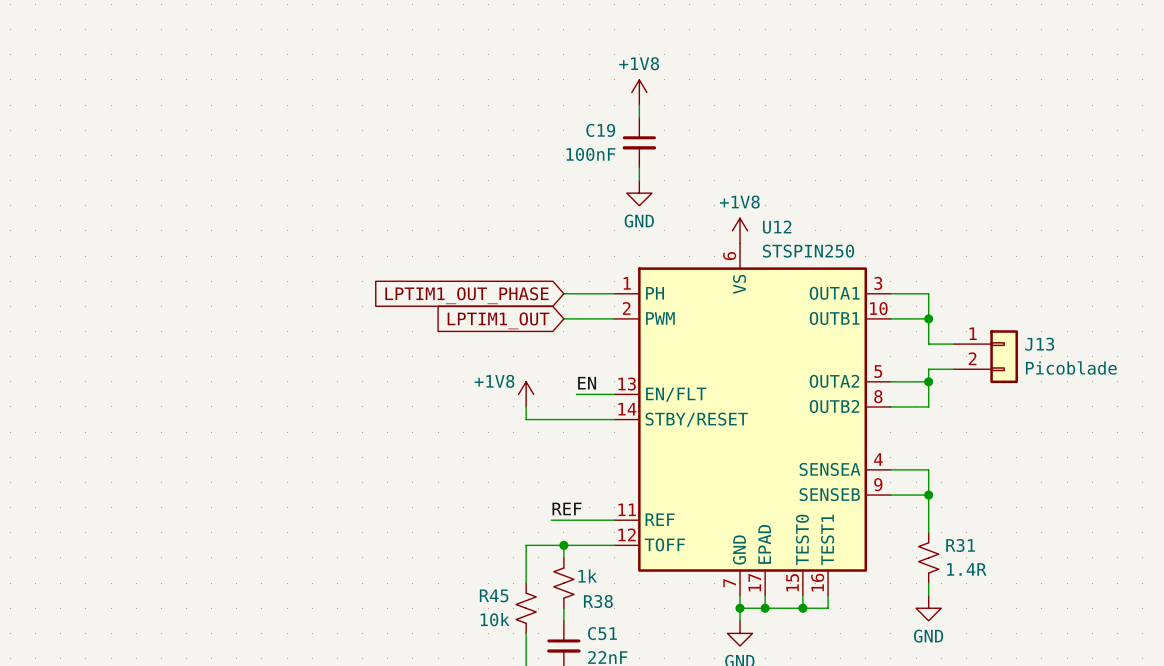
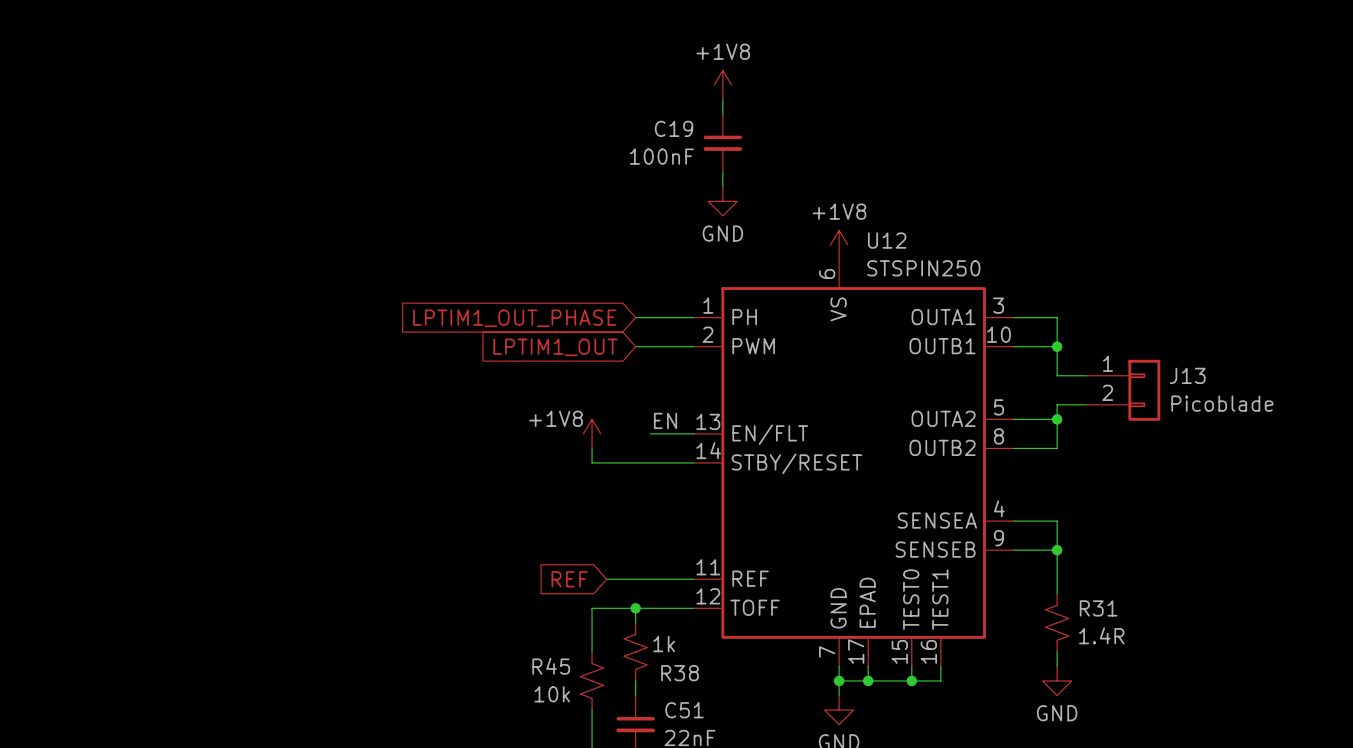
label: REF (566, 508) -> none
global label: none -> REF (569, 579)
wire: none -> (606, 579) (621, 579)

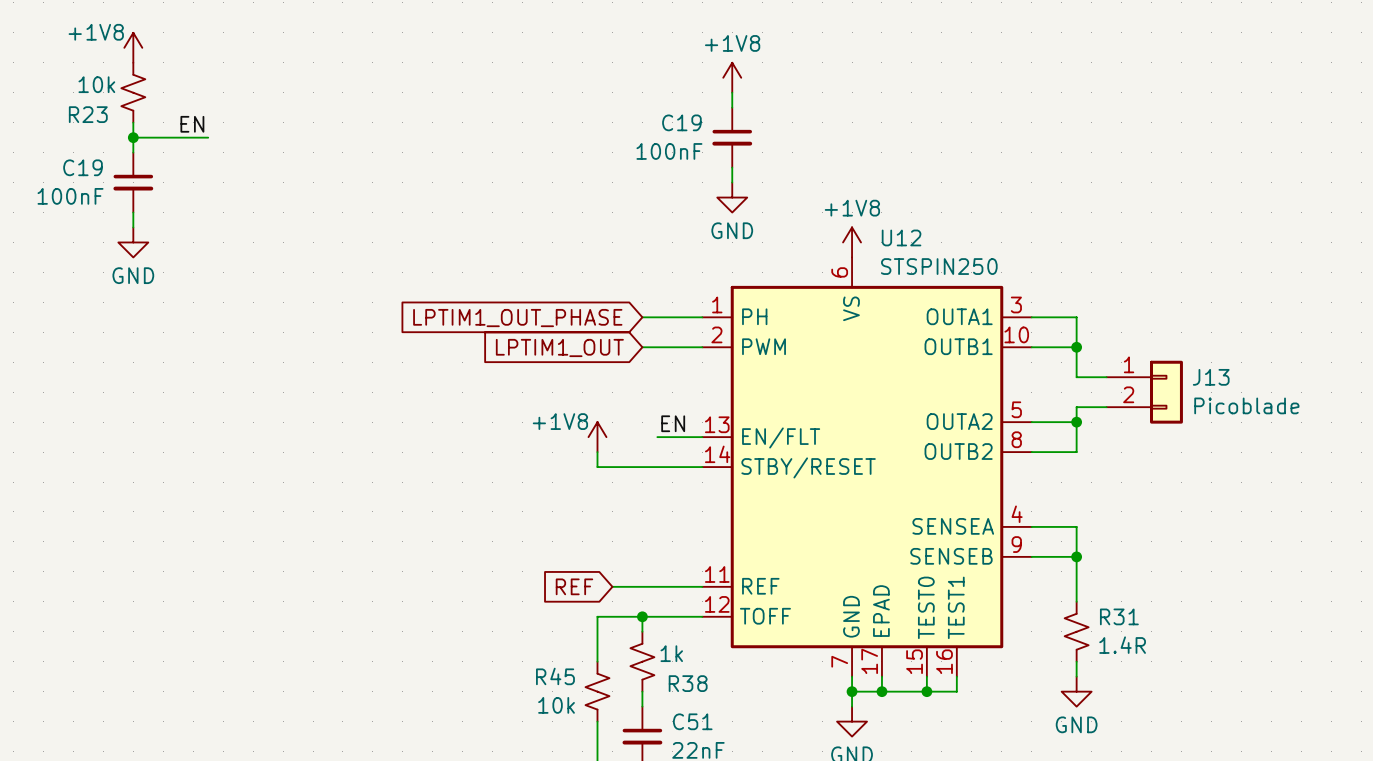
power symbol: none -> +1V8 (133, 47)
R23: none -> 10k (133, 92)
wire: none -> (133, 122) (133, 152)
label: none -> EN (192, 124)
wire: none -> (133, 137) (208, 137)
junction: none -> (133, 137)
C19: none -> 100nF (133, 182)
wire: none -> (133, 212) (133, 227)
power symbol: none -> GND (133, 242)

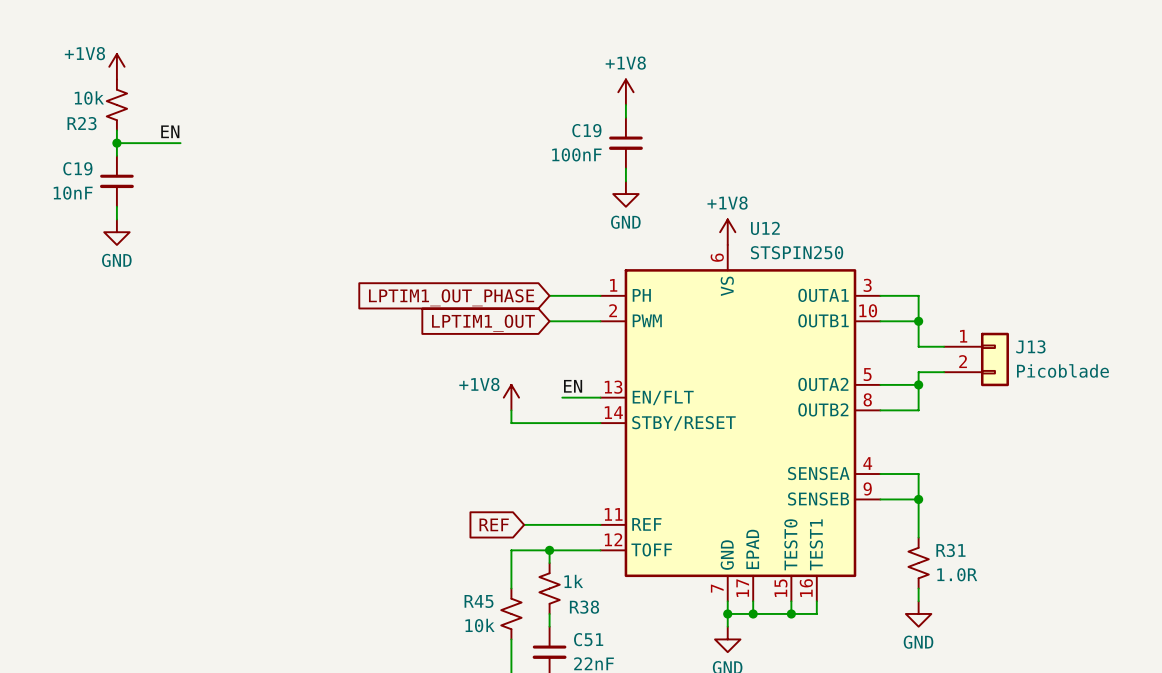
C19 value: 100nF (70, 196) -> 10nF (73, 193)
R31 value: 1.4R (1122, 645) -> 1.0R (957, 574)

